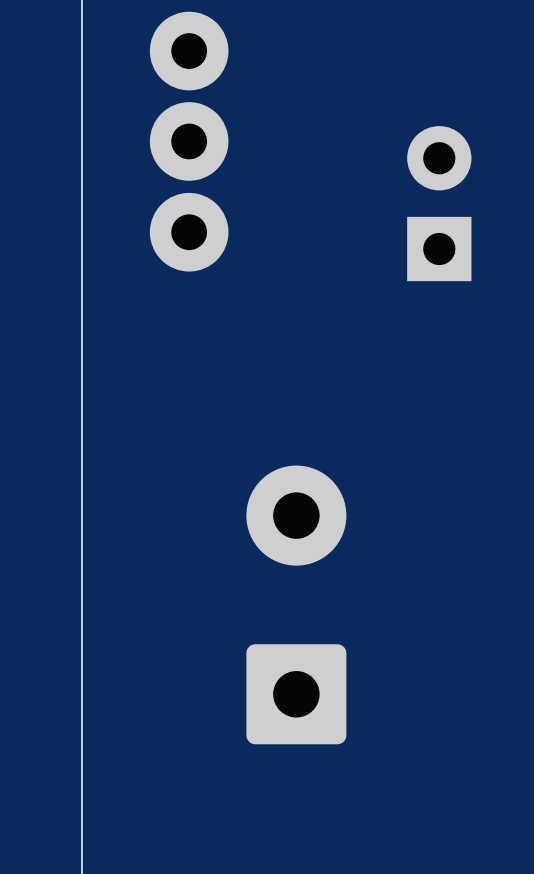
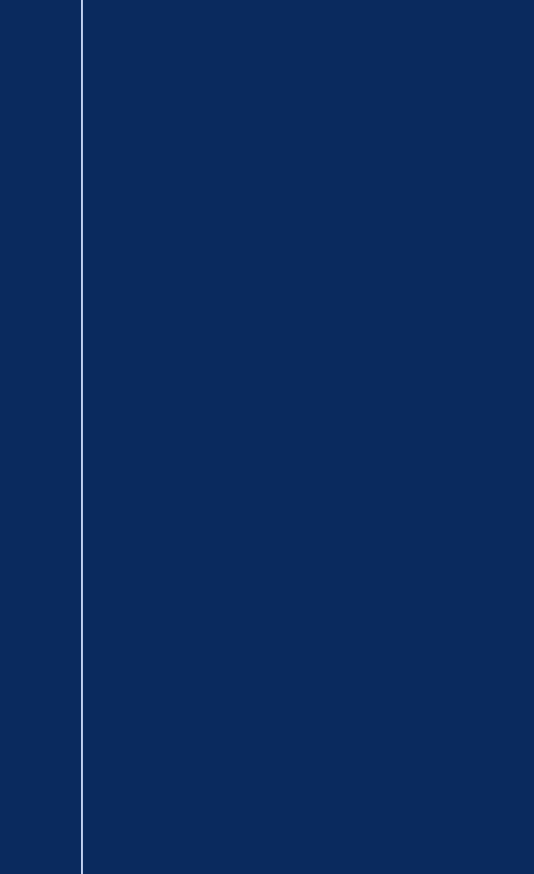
part: (189, 141) -> none
part: (439, 203) -> none
part: (296, 604) -> none

